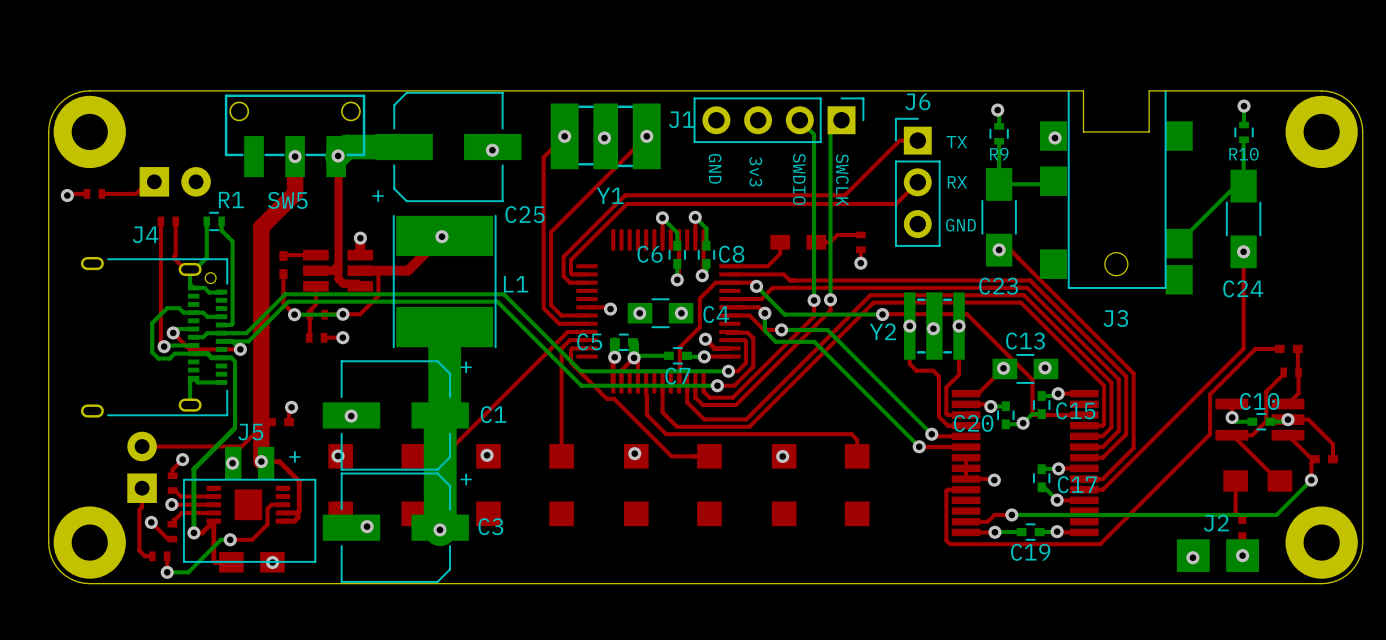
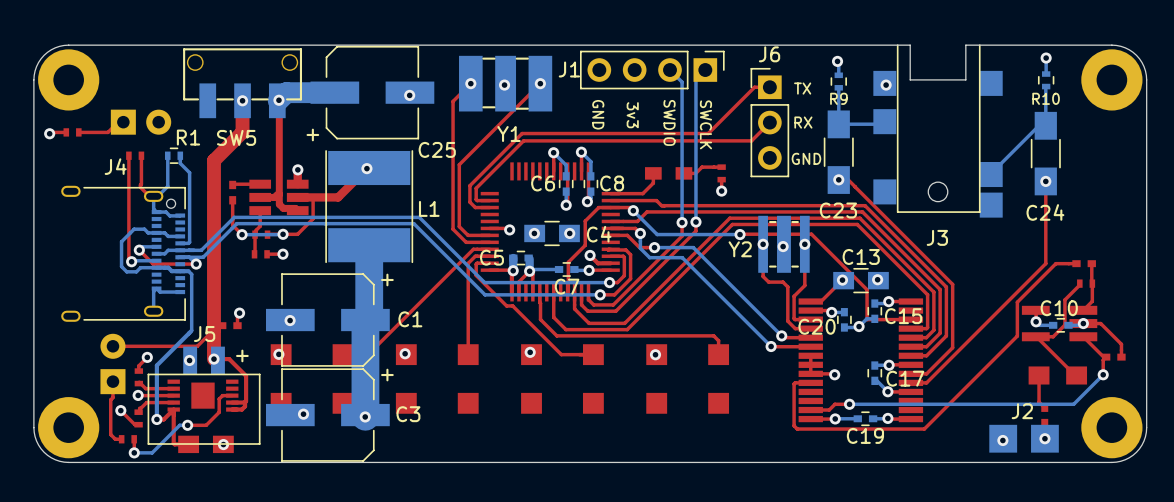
top track: none -> (489, 270) (513, 270)

